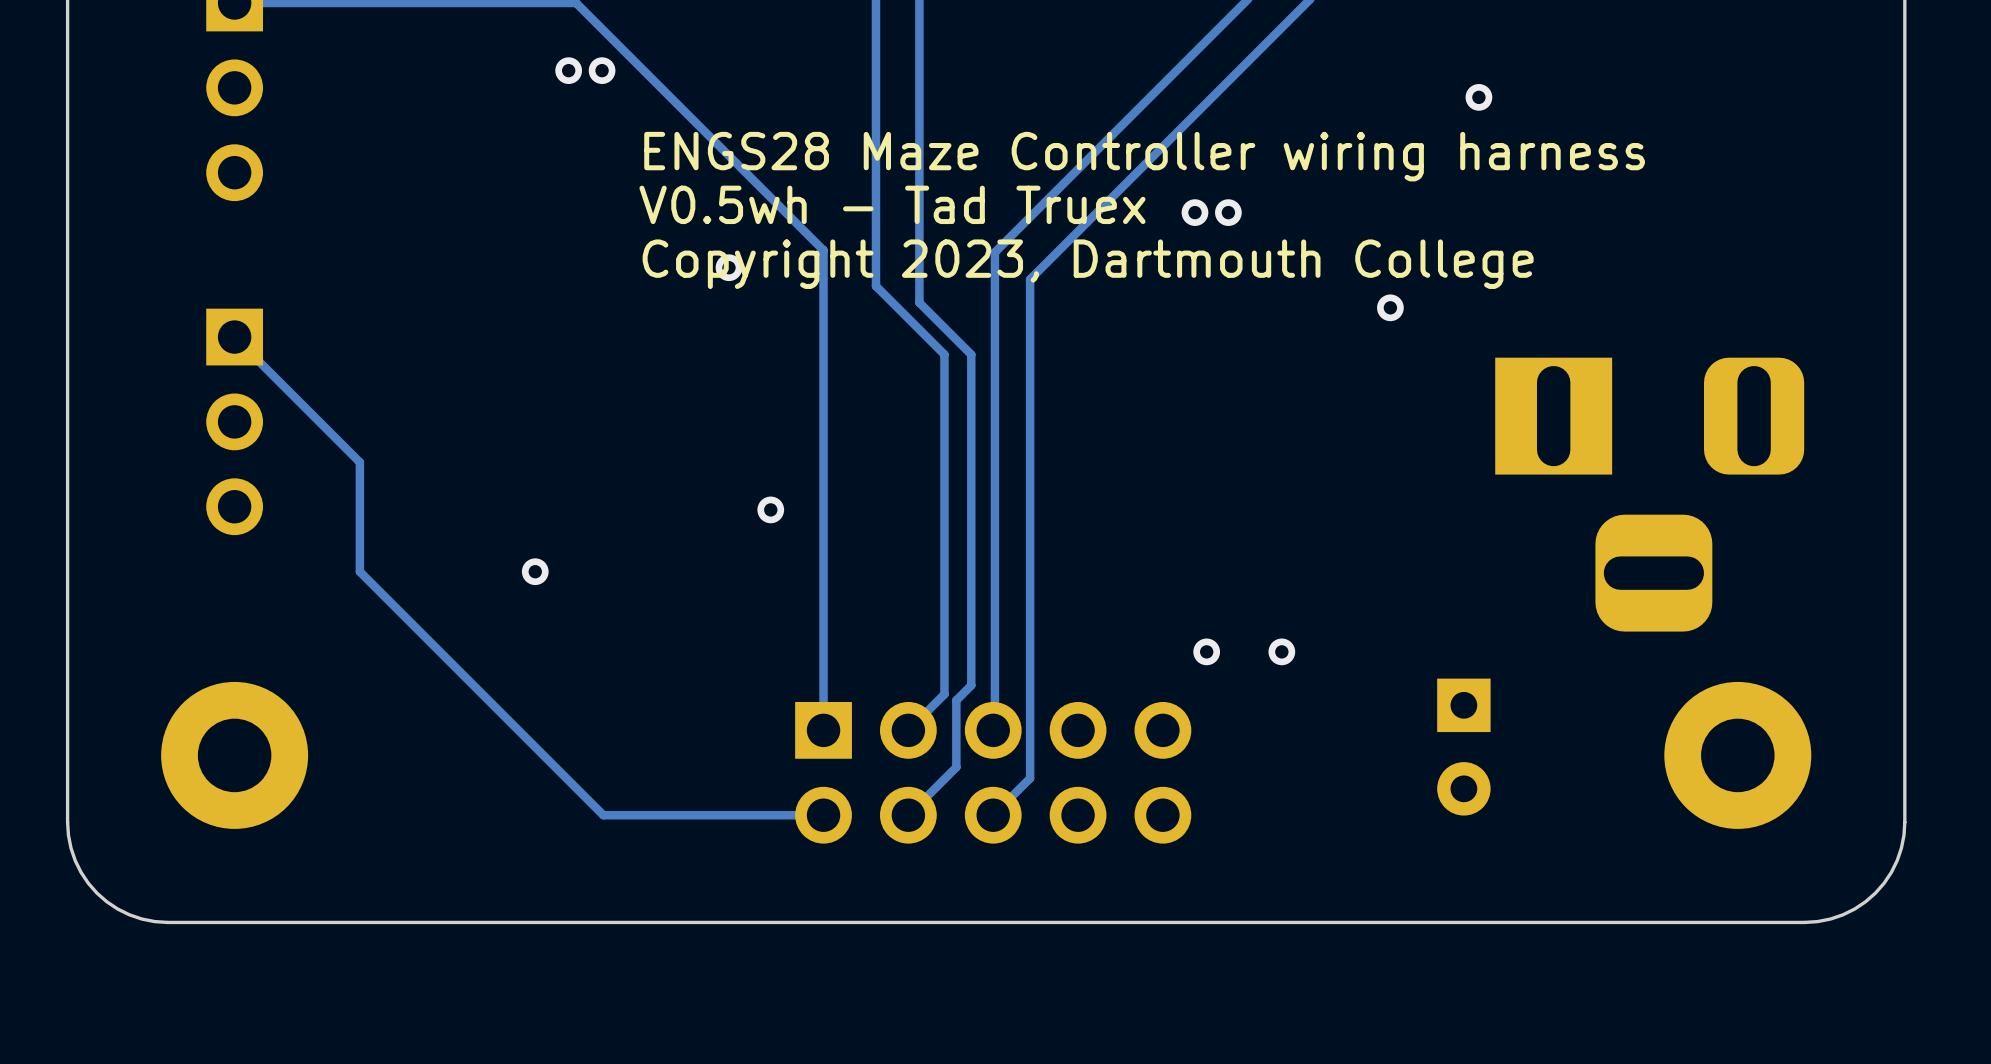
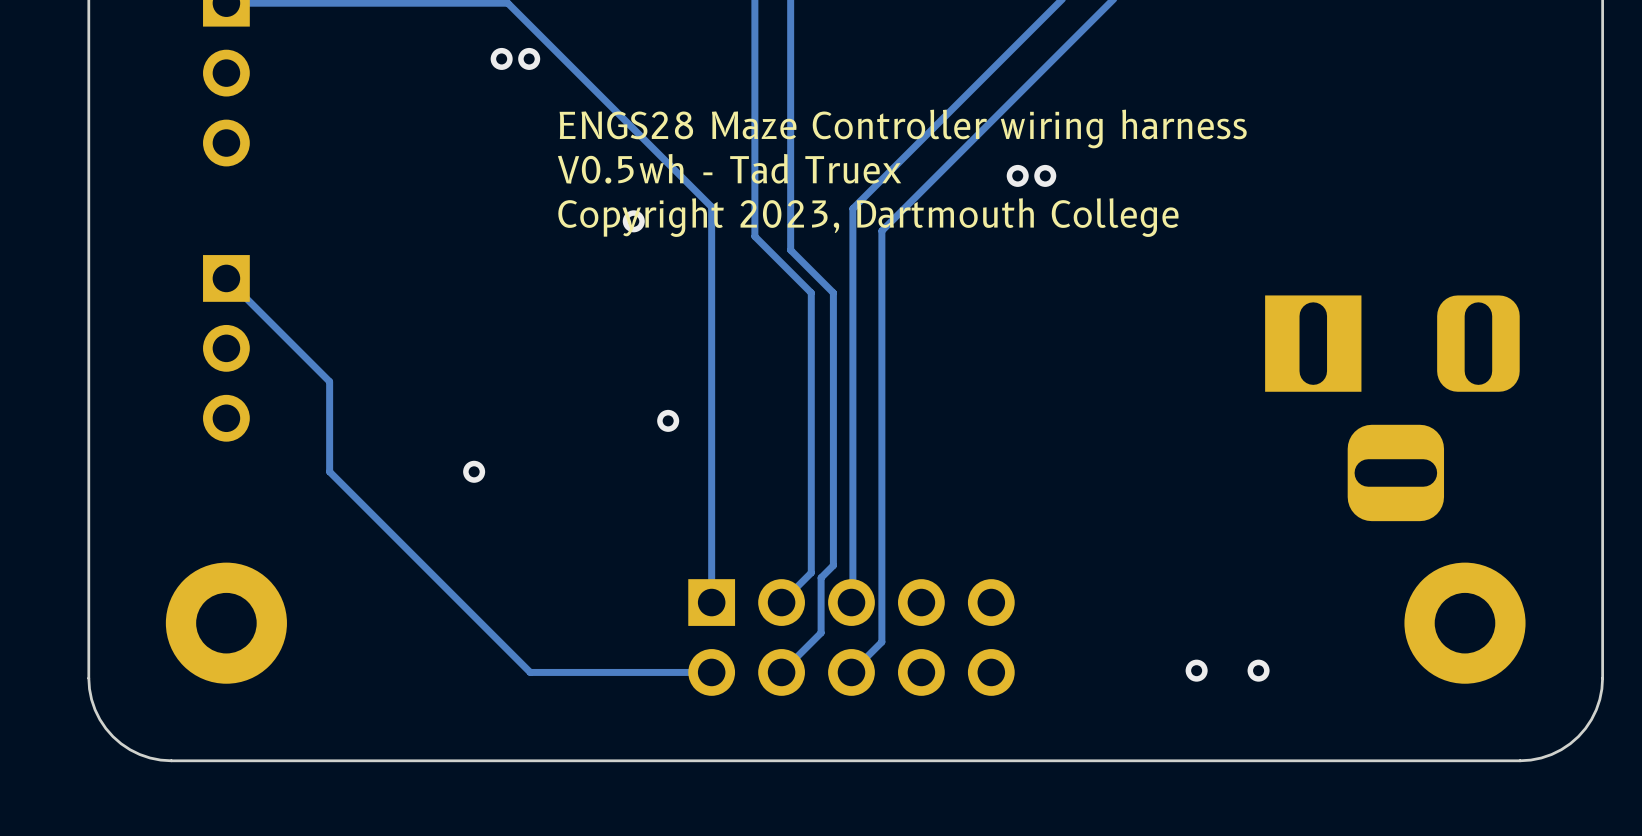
via: (1478, 97) -> none
via: (1390, 307) -> none
via: (1206, 651) -> none
via: (1281, 651) -> none
part: (1463, 747) -> none
via: none -> (1196, 670)
via: none -> (1258, 670)

